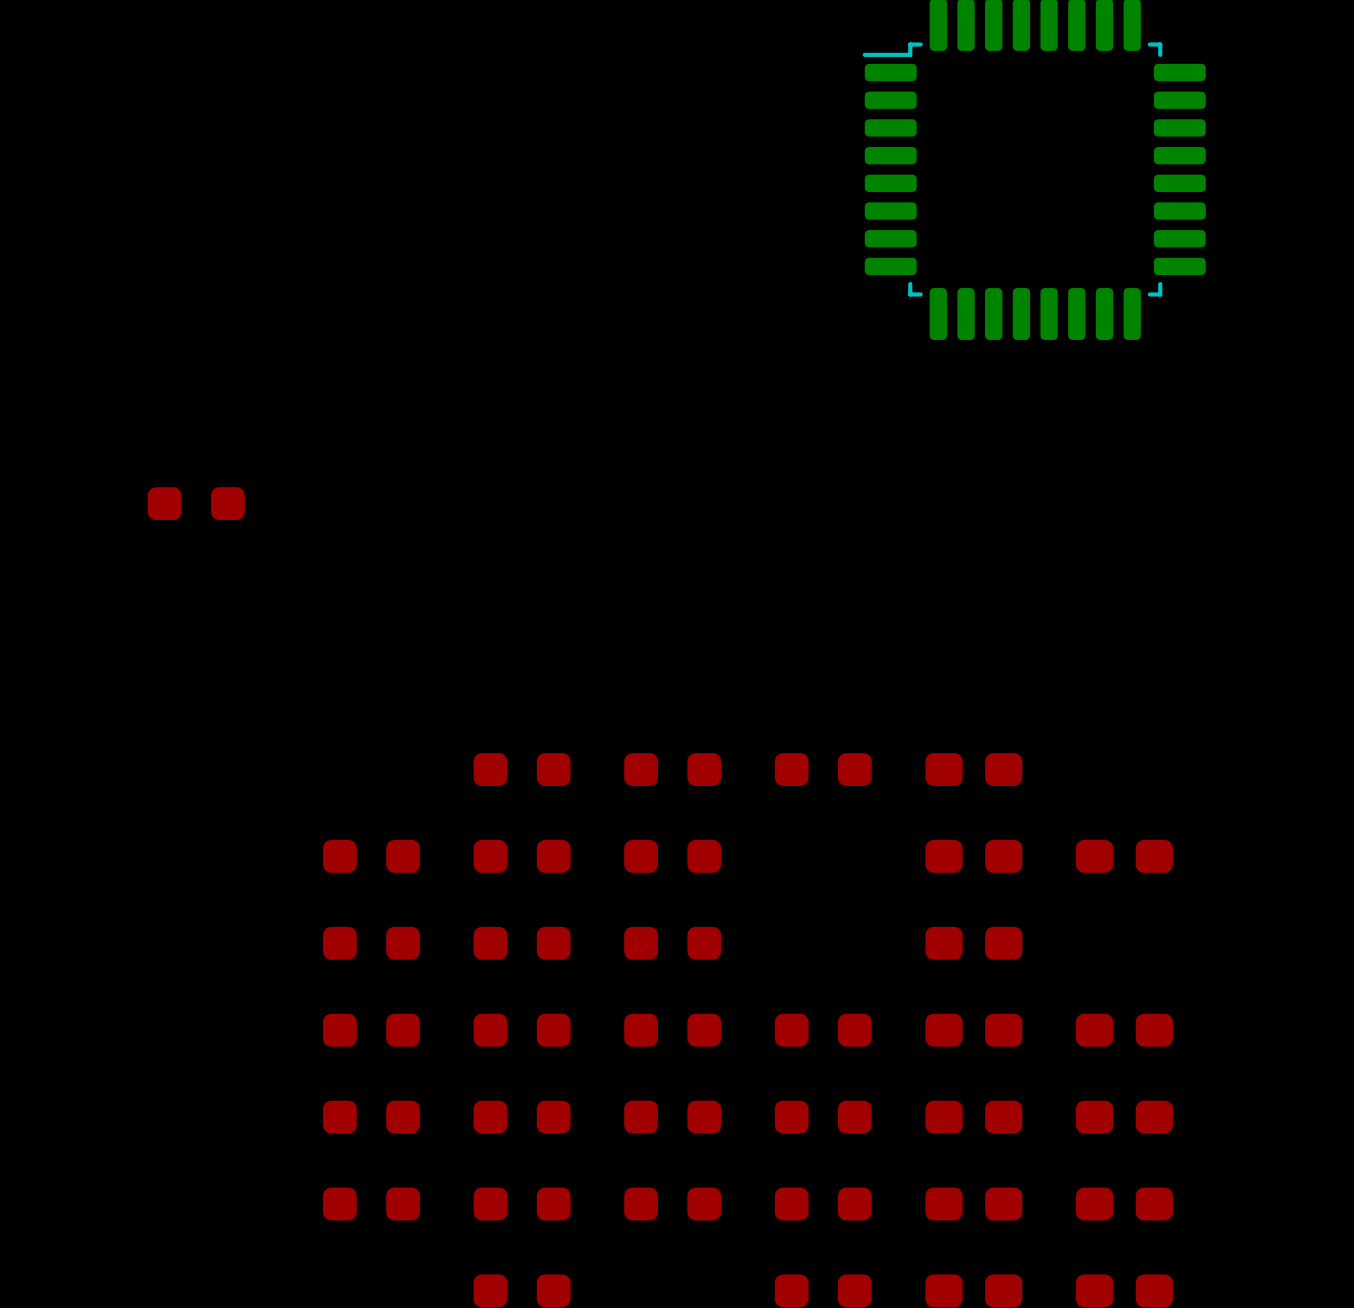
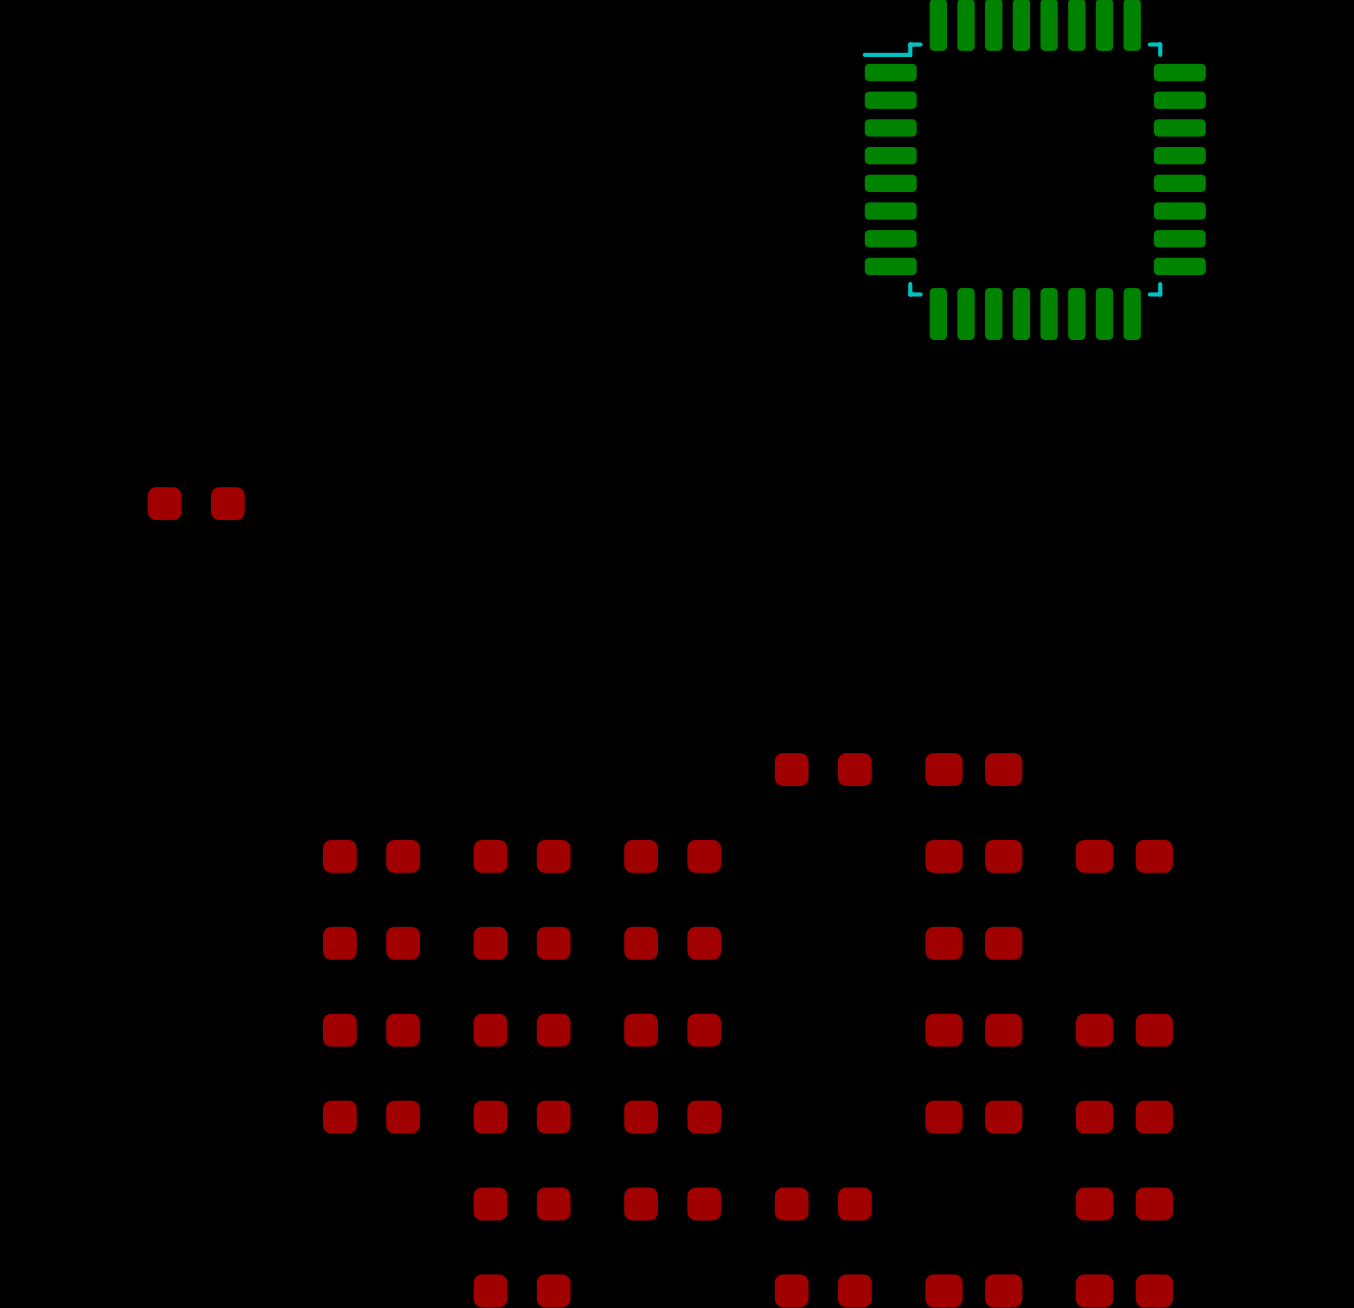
part: (522, 769) -> none
part: (672, 769) -> none
part: (823, 1030) -> none
part: (823, 1117) -> none
part: (371, 1203) -> none
part: (973, 1203) -> none

